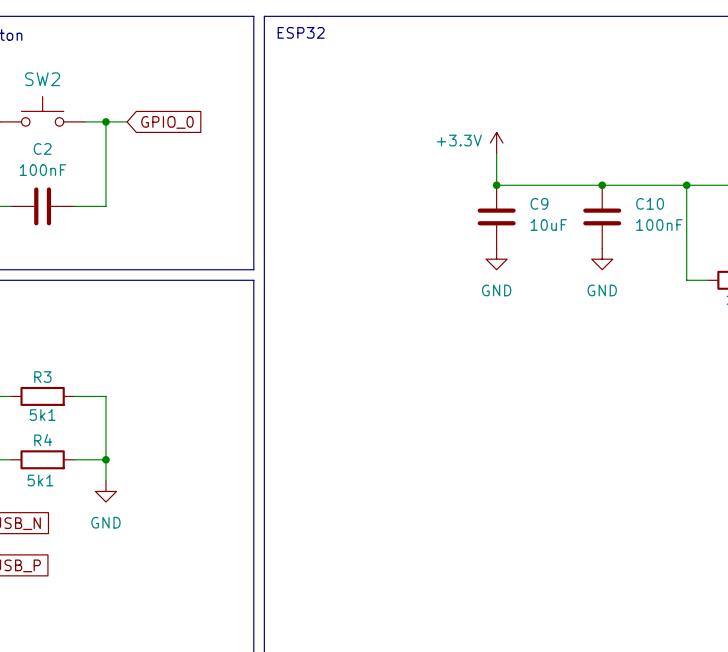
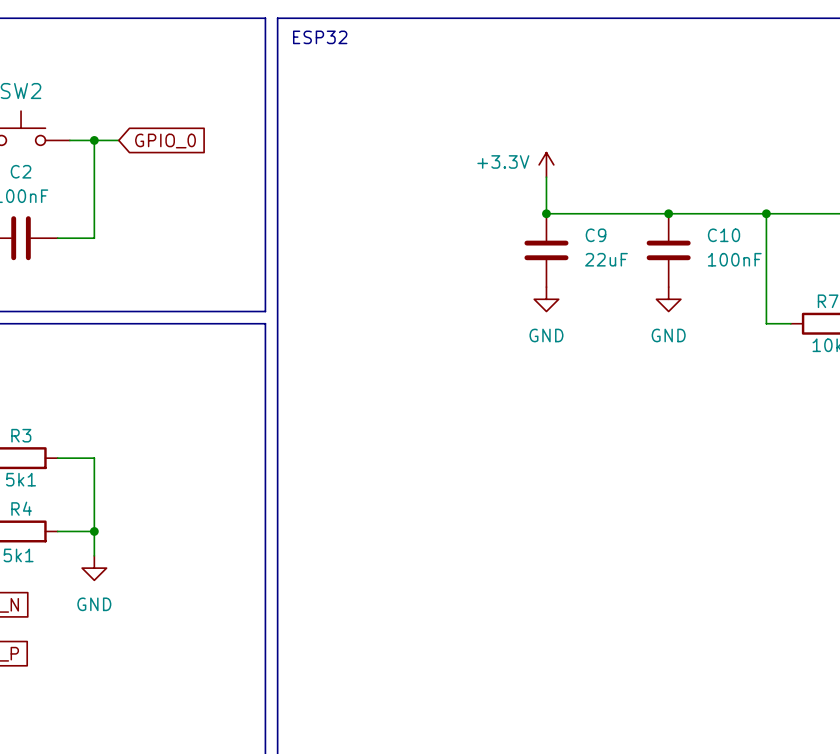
C9 value: 10uF (548, 225) -> 22uF (606, 259)

